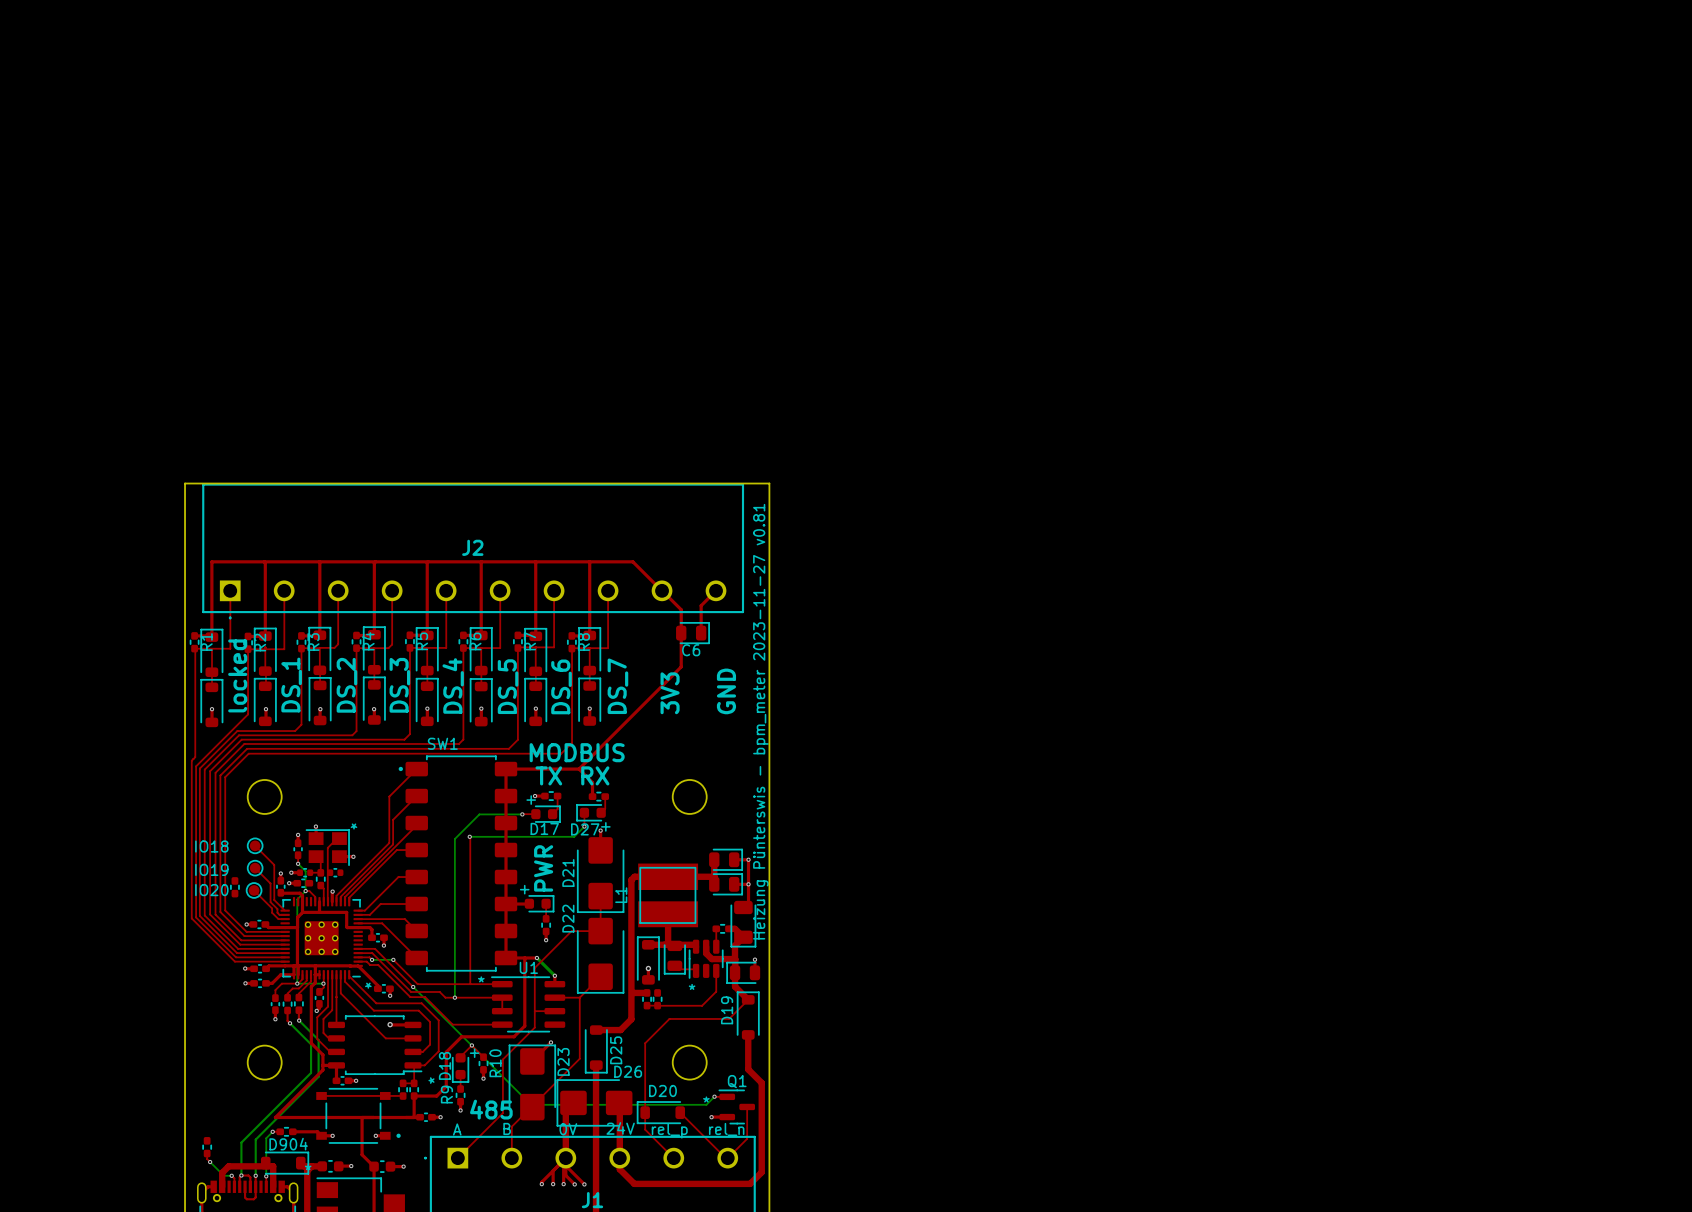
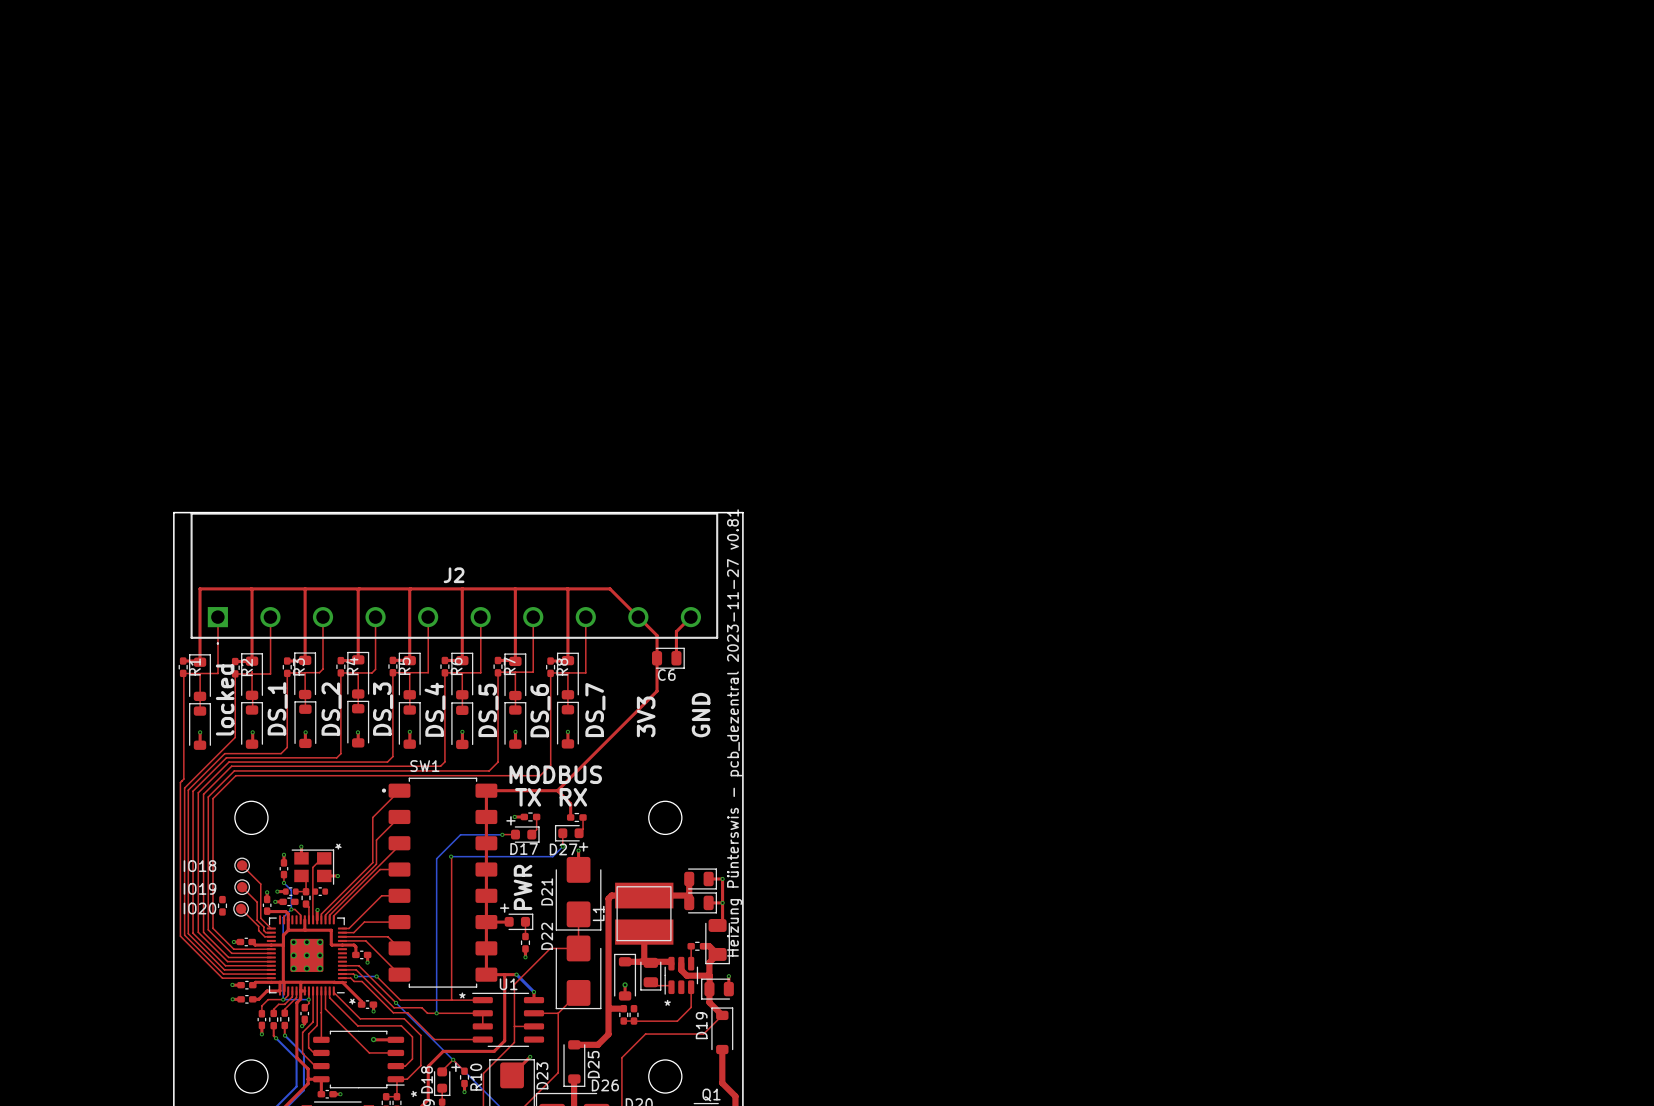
text: Heizung Pünterswis - bpm_meter 2023-11-27 v0.81 (760, 721) -> Heizung Pünterswis - pcb_dezentral 2023-11-27 v0.81 (734, 732)

